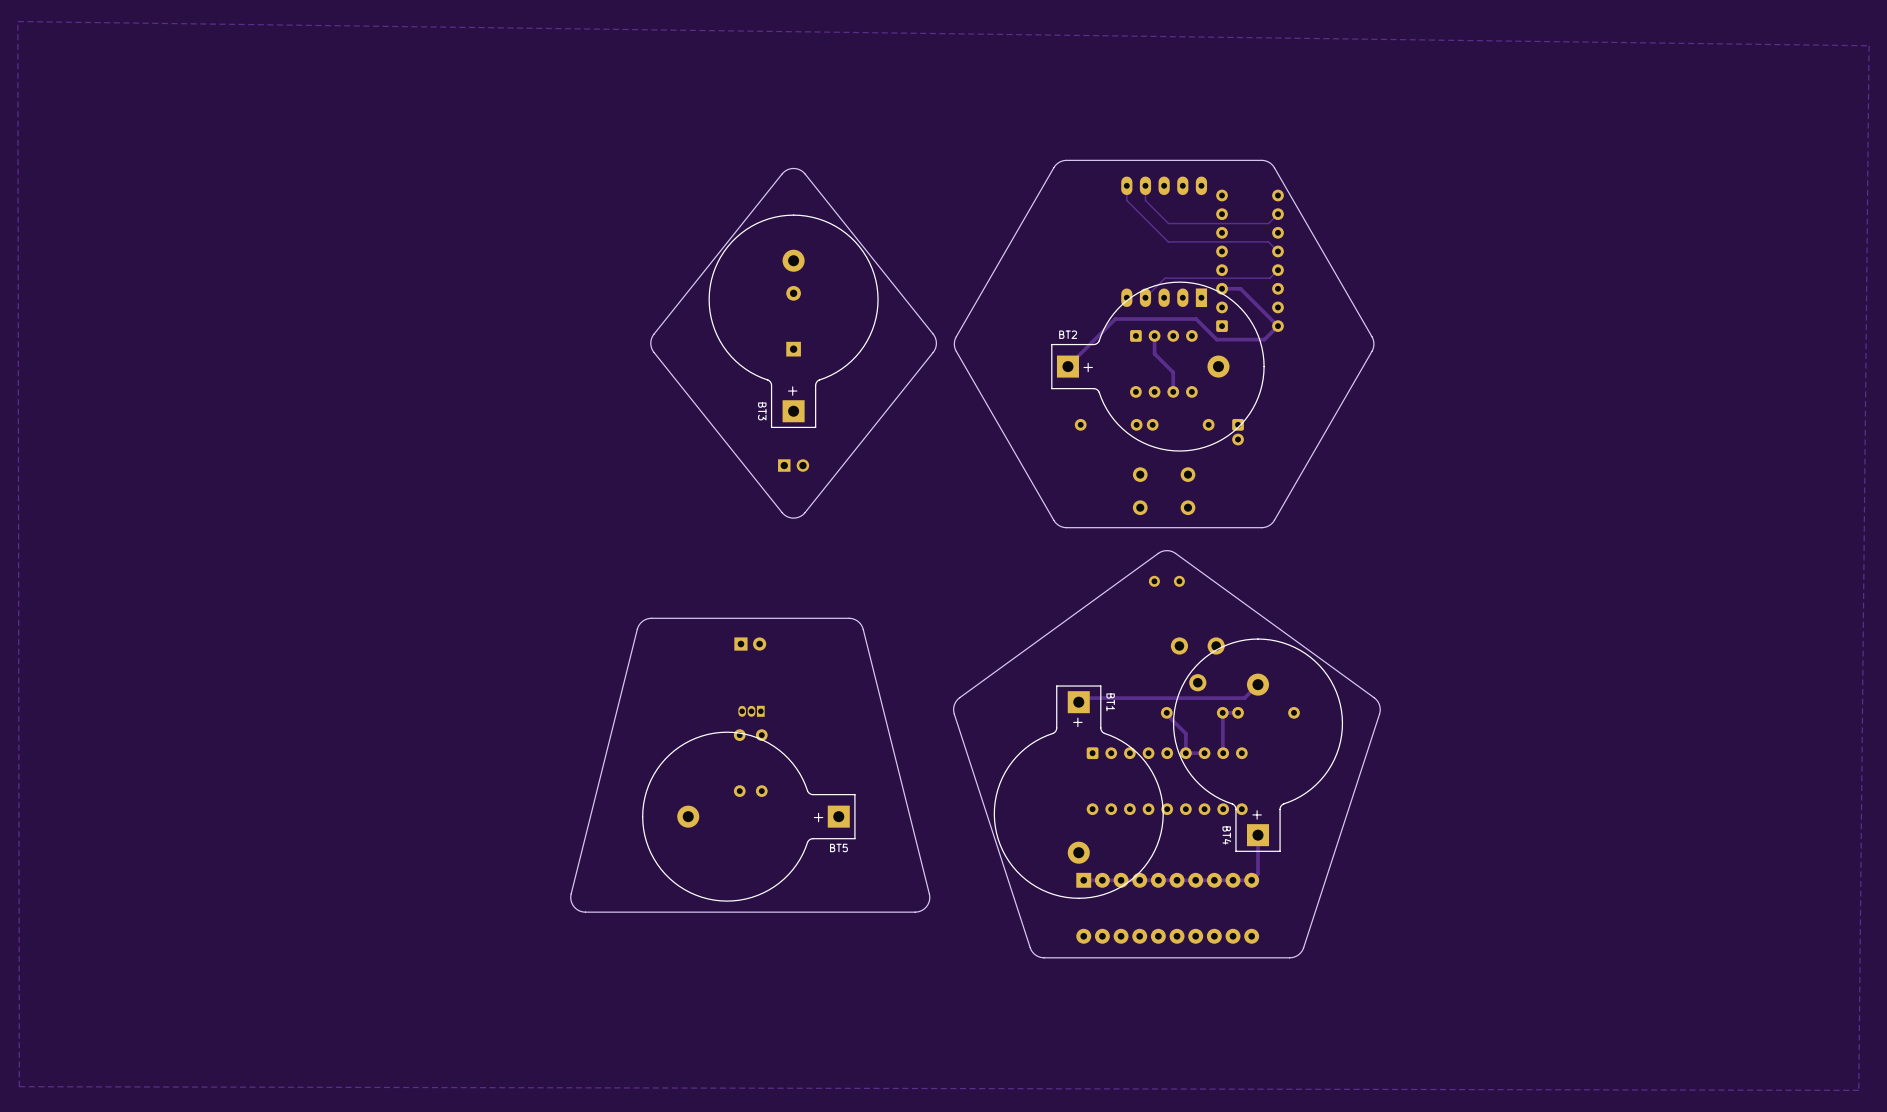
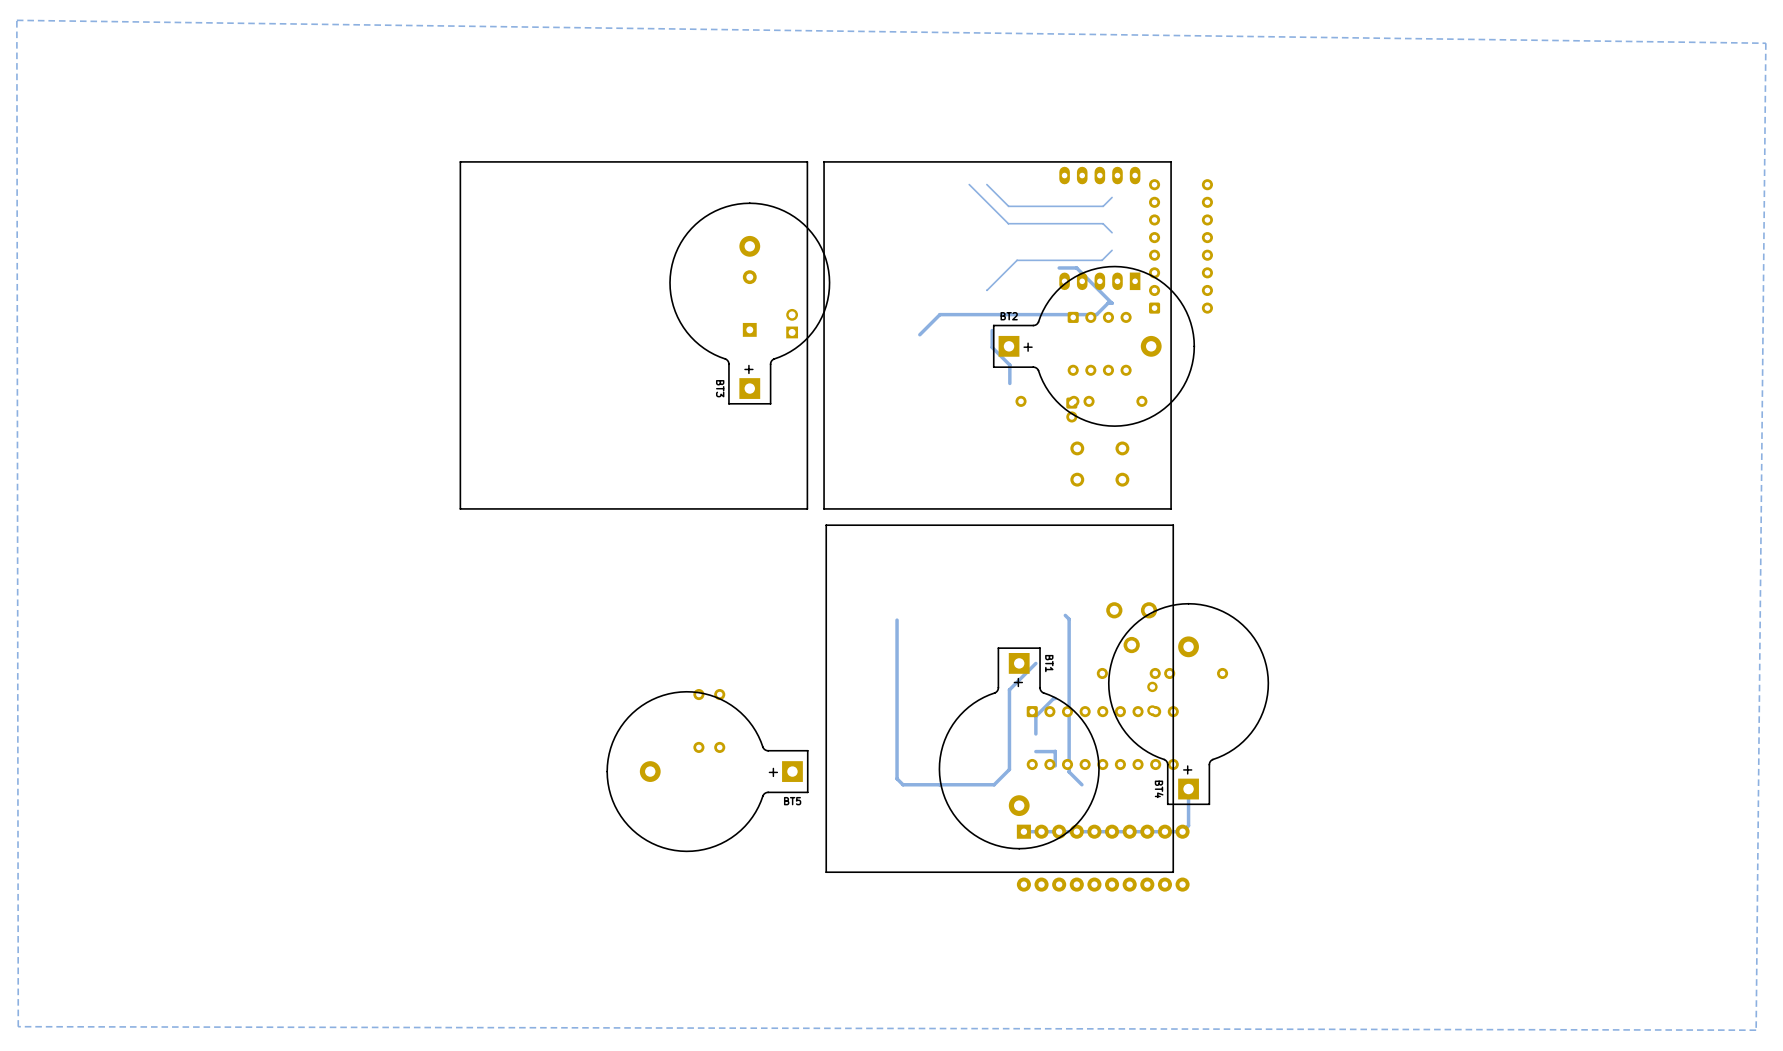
board edge: (1261, 160) (1066, 160) (1059, 162) (1053, 167) (956, 336) (954, 344) (956, 351) (1053, 520) (1059, 525) (1066, 527) (1261, 527) (1269, 525) (1274, 520) (1371, 351) (1373, 344) (1371, 336) (1274, 167) (1269, 162) (1261, 160) -> (1171, 161) (1171, 508) (824, 508) (824, 161) (1171, 161)
board edge: none -> (807, 161) (460, 161) (460, 508) (807, 508) (807, 161)
board edge: (805, 173) (933, 334) (936, 343) (933, 352) (805, 512) (793, 518) (782, 512) (654, 352) (650, 343) (654, 334) (783, 172) (795, 168) (805, 173) -> none
track: (1126, 185) (1126, 200) (1168, 241) (1268, 241) (1277, 251) -> none
track: (1145, 185) (1145, 200) (1168, 223) (1268, 223) (1277, 214) -> none
track: none -> (969, 184) (1008, 223) (1103, 223) (1112, 232)
track: none -> (986, 184) (1008, 206) (1103, 206) (1112, 197)
track: none -> (1112, 250) (1102, 260) (1017, 260) (986, 290)
track: (1277, 270) (1269, 278) (1165, 278) (1145, 297) -> none
track: (1222, 288) (1240, 288) (1277, 326) -> (1059, 267) (1076, 267) (1111, 303)
track: none -> (1112, 303) (1108, 303) (1096, 314) (939, 314) (919, 334)
track: (1277, 326) (1264, 339) (1216, 339) (1196, 319) (1115, 319) (1067, 366) -> none
track: (1154, 335) (1154, 353) (1173, 372) (1173, 391) -> (992, 330) (992, 347) (1009, 365) (1009, 383)
part position: (1238, 432) -> (1071, 410)
part rotation: 0° (793, 465) -> 90° counterclockwise (792, 323)
part position: (793, 465) -> (792, 323)
board edge: (1175, 553) (1374, 697) (1379, 705) (1379, 714) (1303, 947) (1298, 955) (1289, 957) (1038, 956) (1030, 947) (954, 714) (954, 705) (959, 697) (1158, 553) (1166, 550) (1175, 553) -> (1173, 525) (1173, 872) (826, 872) (826, 525) (1173, 525)
part rotation: 0° (1166, 581) -> 90° clockwise (1152, 698)
part position: (1166, 581) -> (1152, 698)
board edge: (848, 618) (651, 618) (641, 622) (637, 629) (571, 893) (571, 901) (575, 907) (585, 912) (915, 912) (925, 907) (929, 901) (929, 893) (863, 629) (858, 621) (848, 618) -> none
part: (750, 644) -> none
track: none -> (1065, 615) (1069, 619) (1069, 771) (1081, 784)
track: none -> (897, 620) (897, 778) (903, 784) (994, 784) (1009, 769) (1009, 689) (1035, 663)
track: (1258, 684) (1244, 698) (1082, 698) (1078, 702) -> none
part: (751, 711) -> none
track: (1166, 712) (1185, 733) (1185, 753) (1204, 753) -> none
track: (1238, 712) (1222, 712) (1223, 753) -> none
track: none -> (1055, 698) (1035, 716) (1035, 733)
track: none -> (1035, 751) (1055, 751) (1055, 765)

